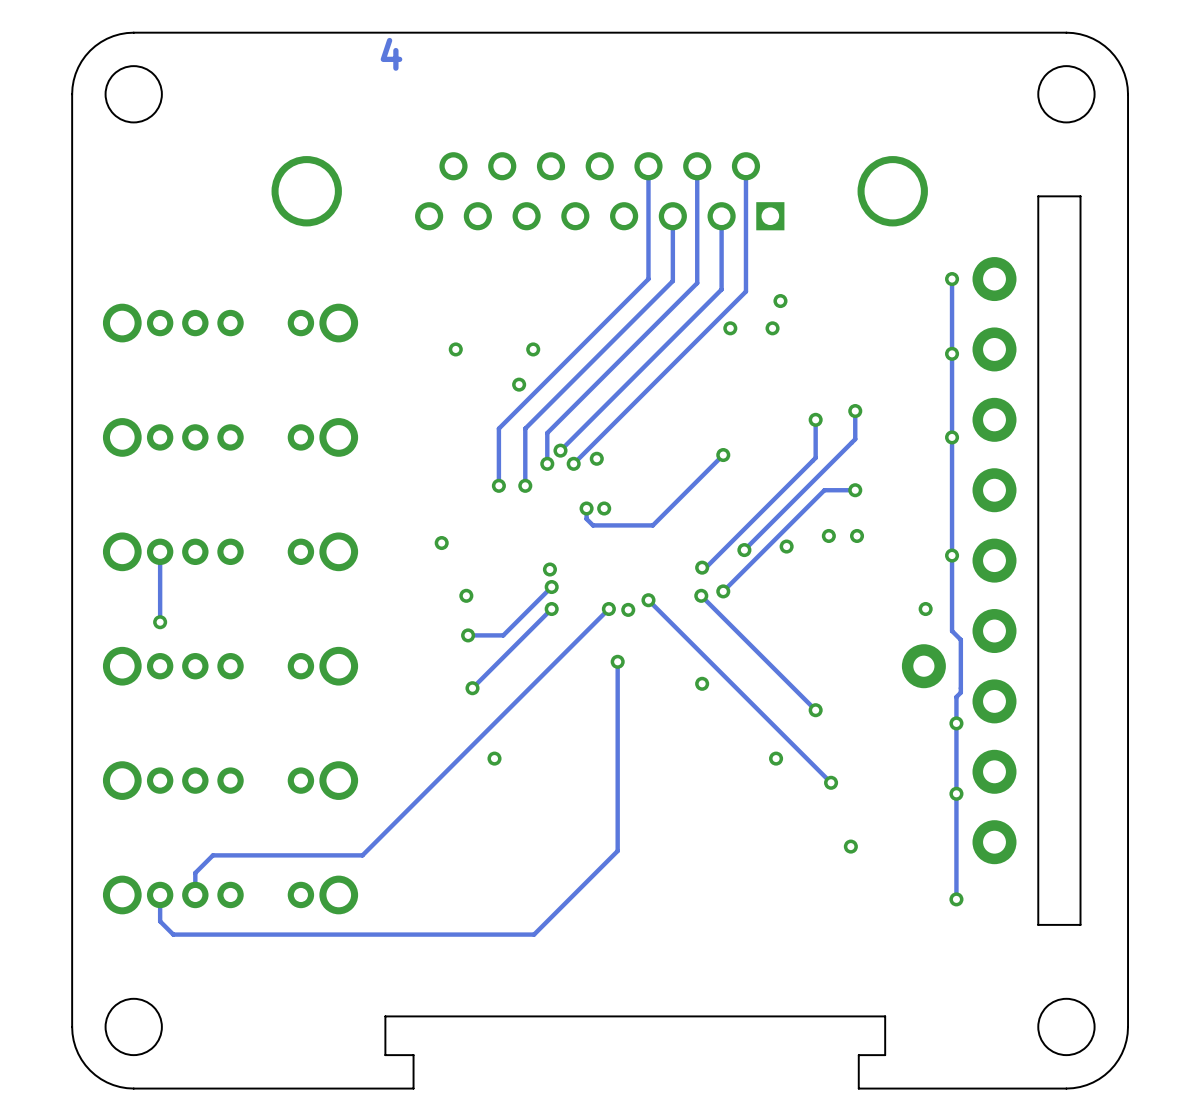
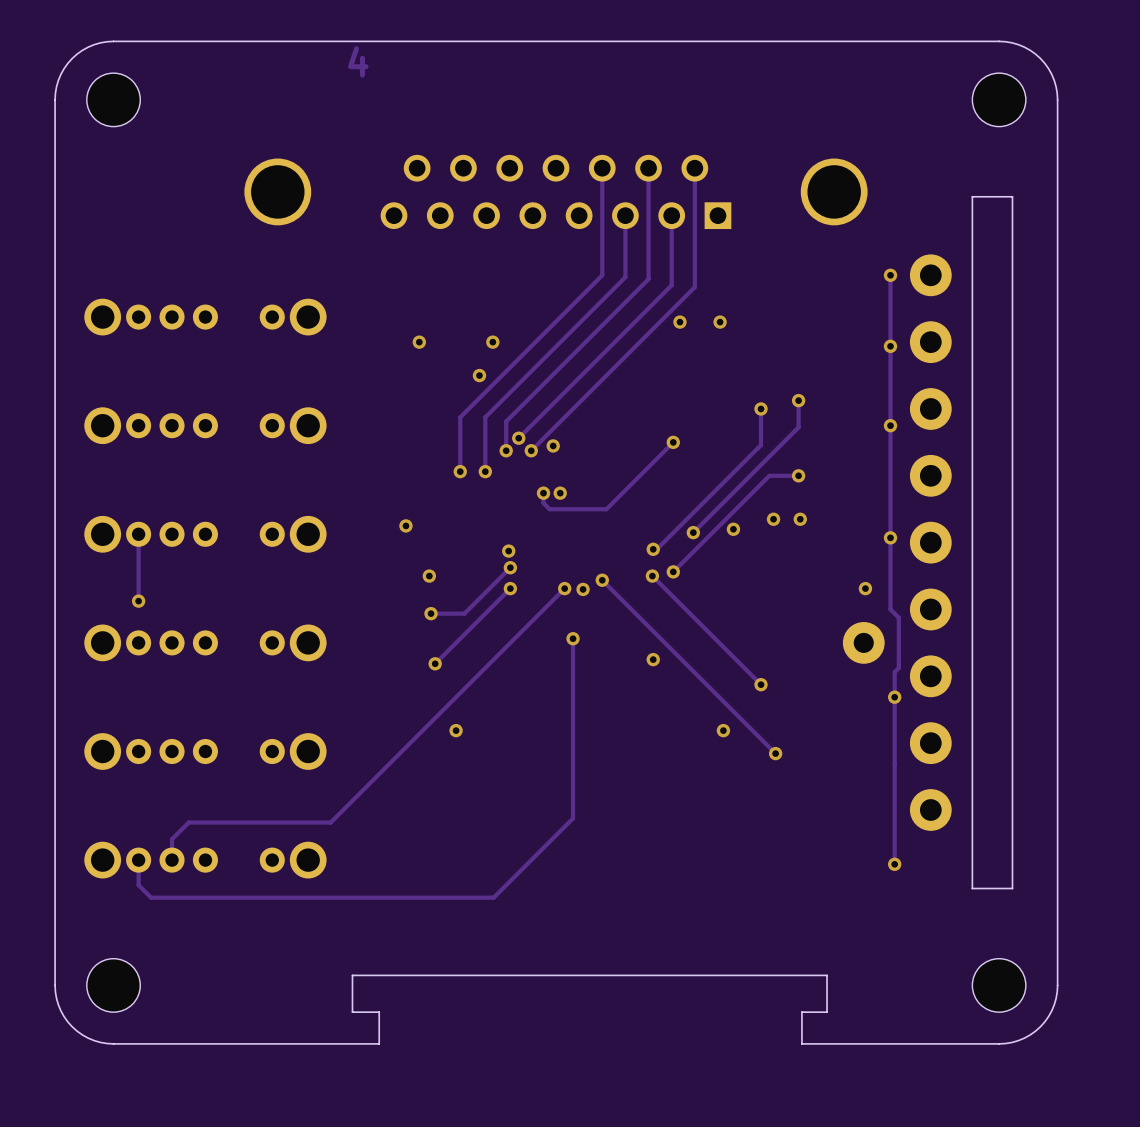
via: (780, 301) -> none
via: (956, 793) -> none
via: (850, 846) -> none

